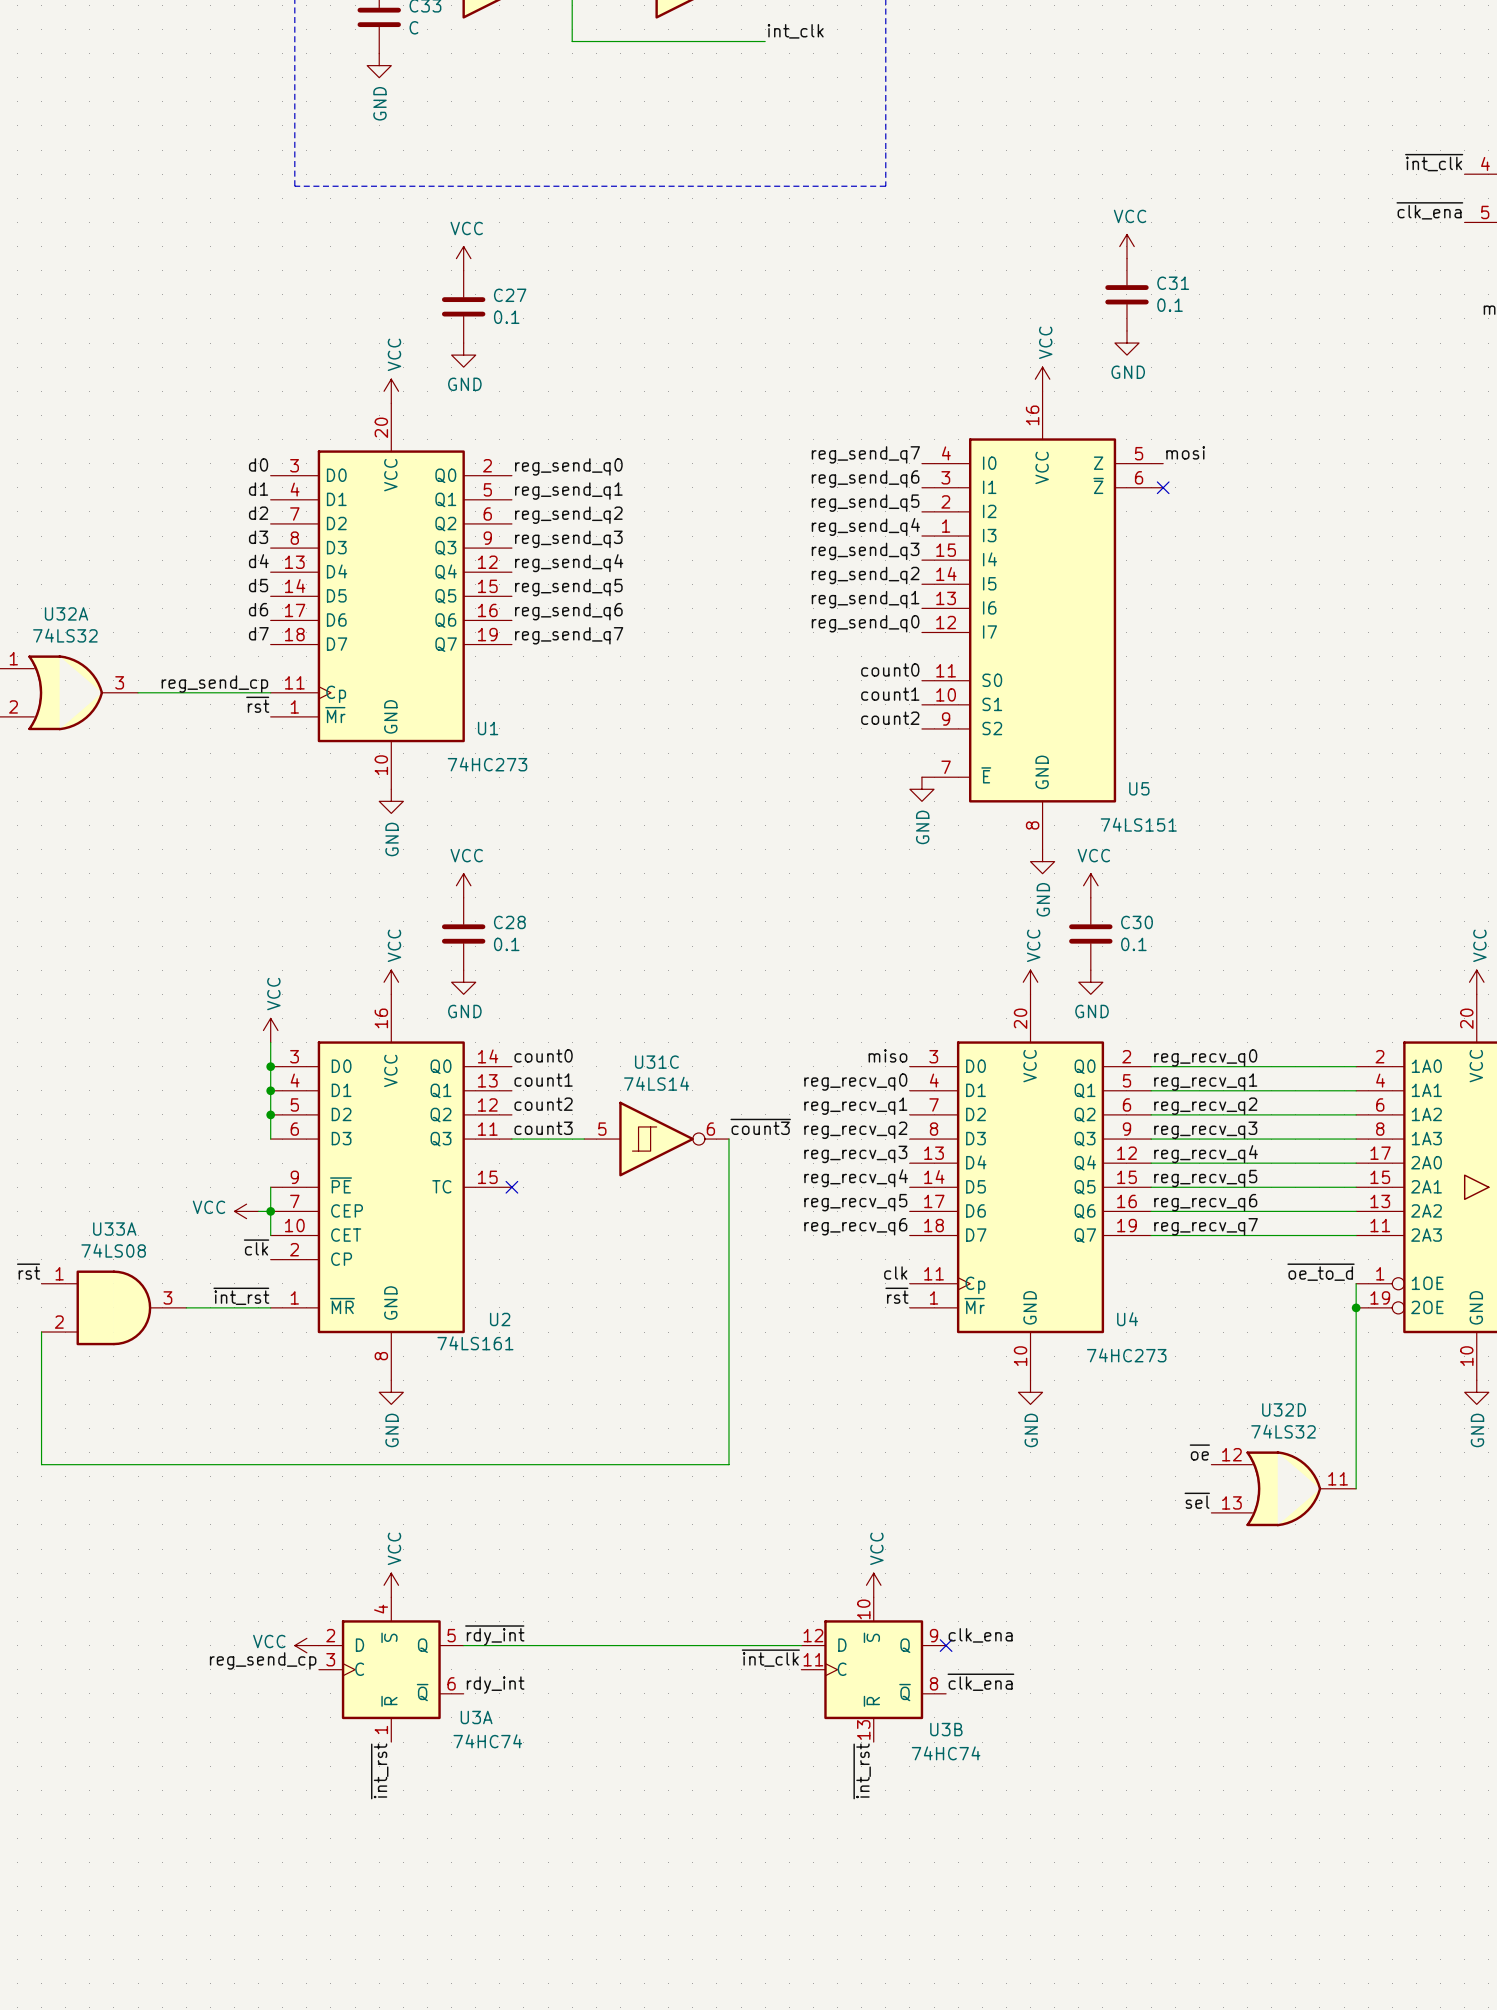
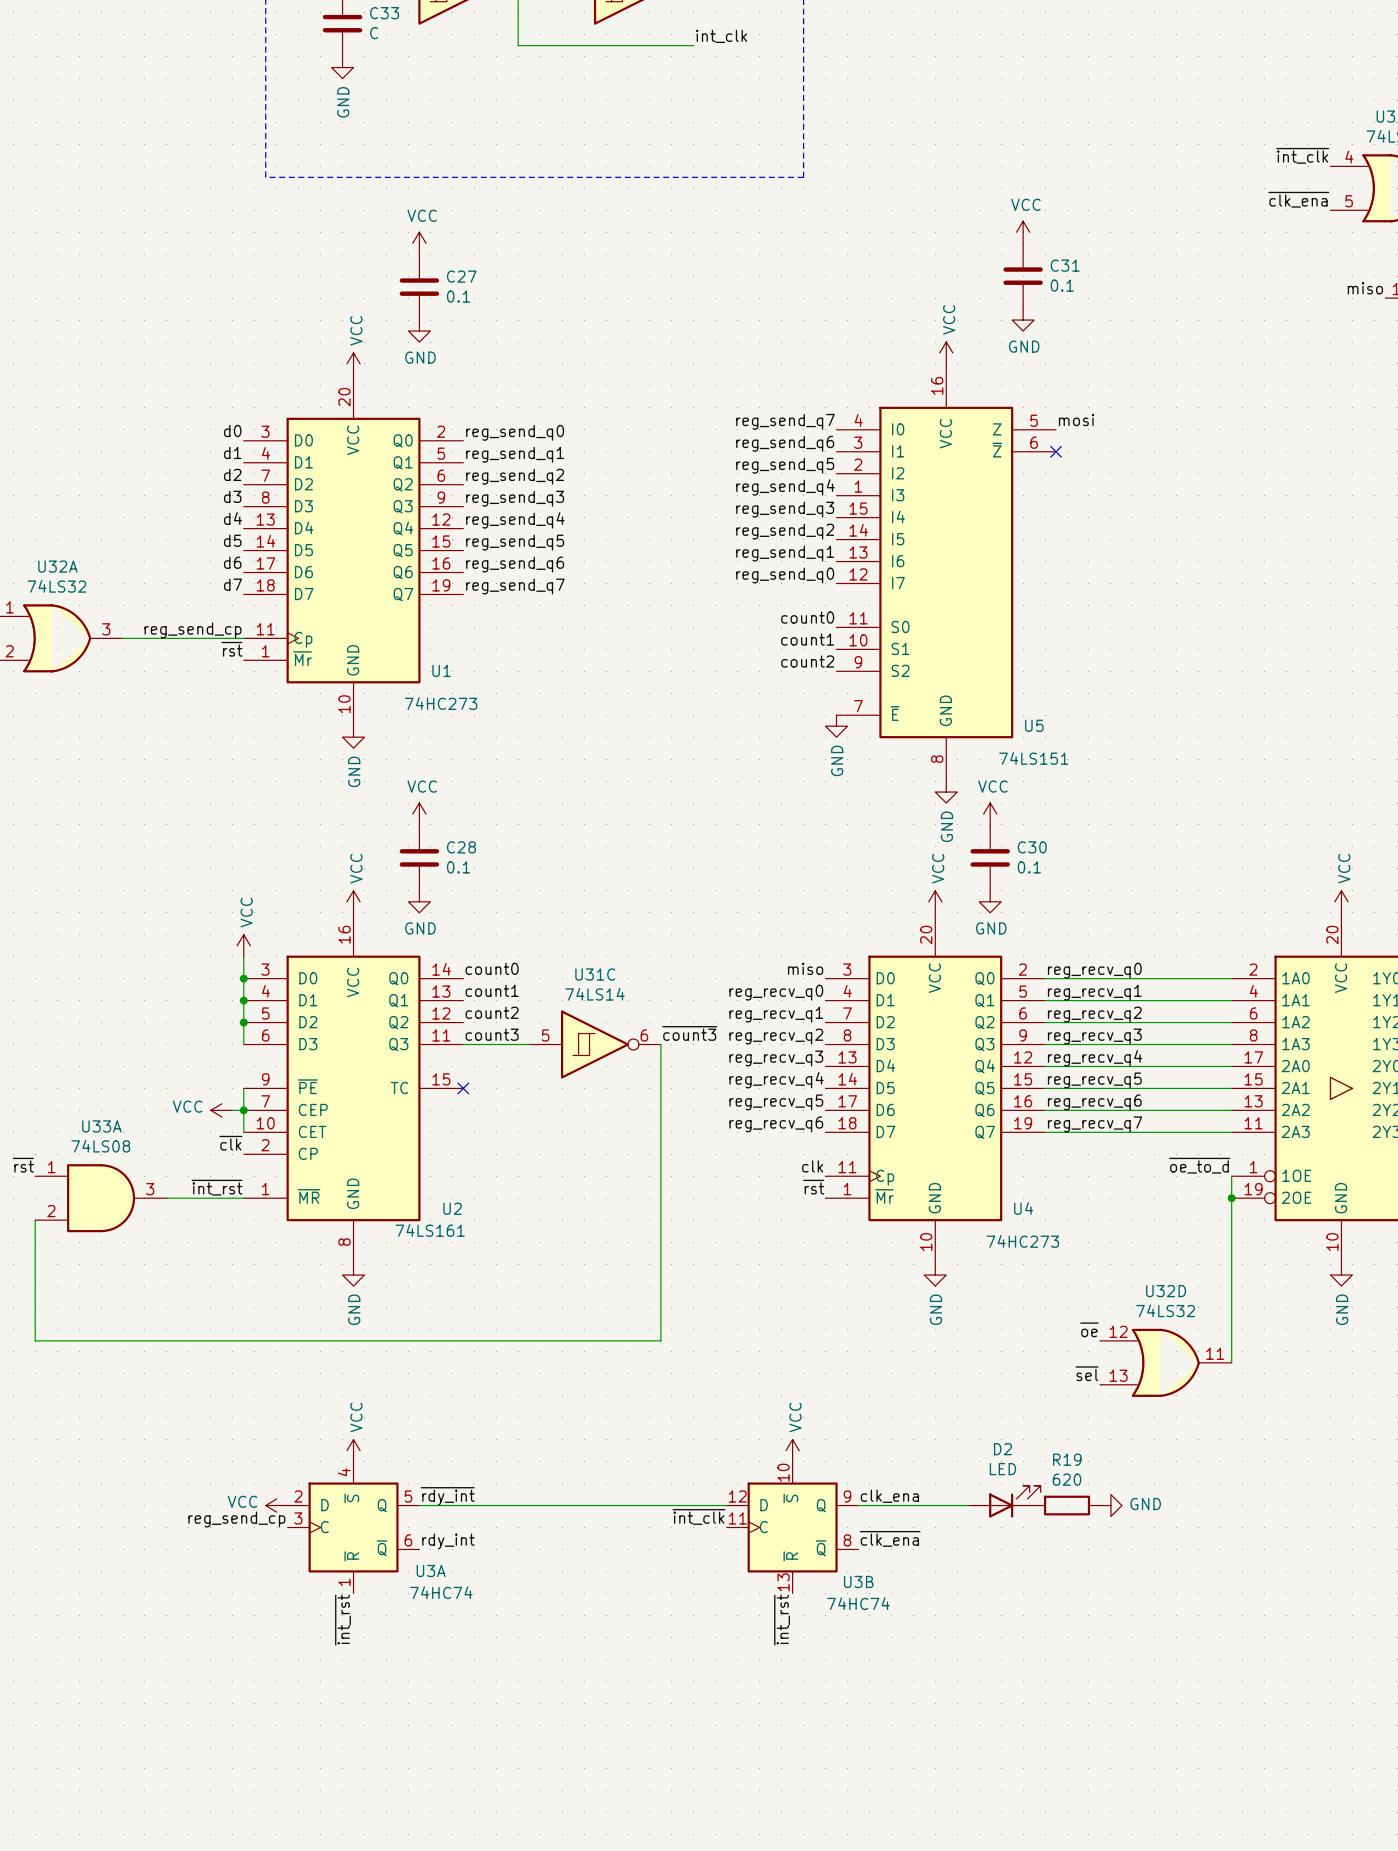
D2: none -> LED (1004, 1501)
wire: none -> (858, 1505) (968, 1505)
no-connect mark: (946, 1645) -> none
R19: none -> 620 (1067, 1505)
power symbol: none -> GND (1110, 1505)

